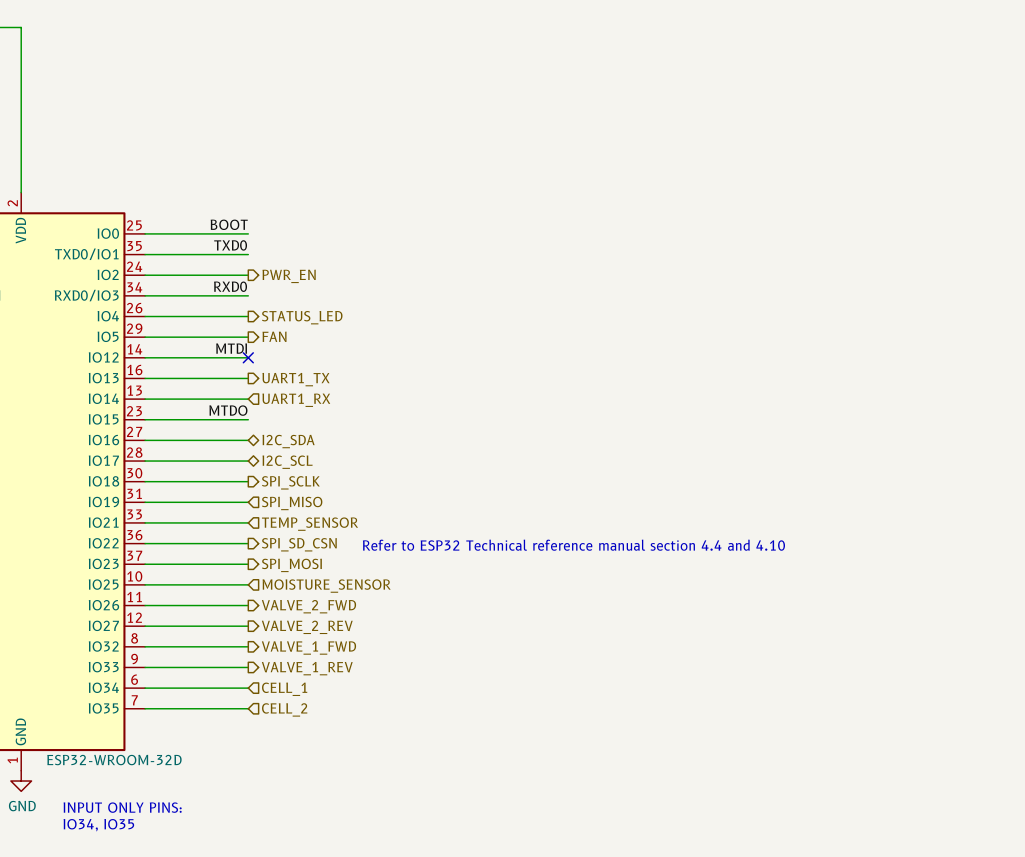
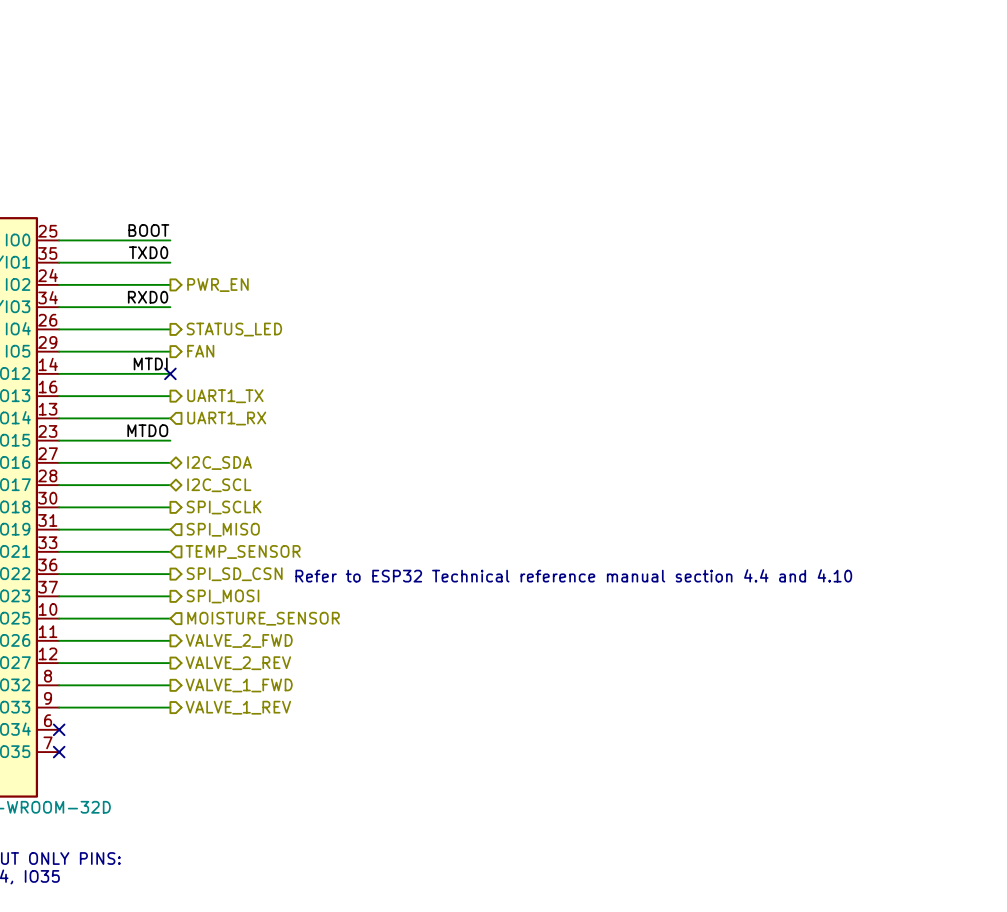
wire: (145, 688) (248, 688) -> none
no-connect mark: none -> (59, 729)
hierarchical label: CELL_1 (284, 689) -> none
wire: (145, 708) (248, 708) -> none
no-connect mark: none -> (59, 752)
hierarchical label: CELL_2 (284, 709) -> none

